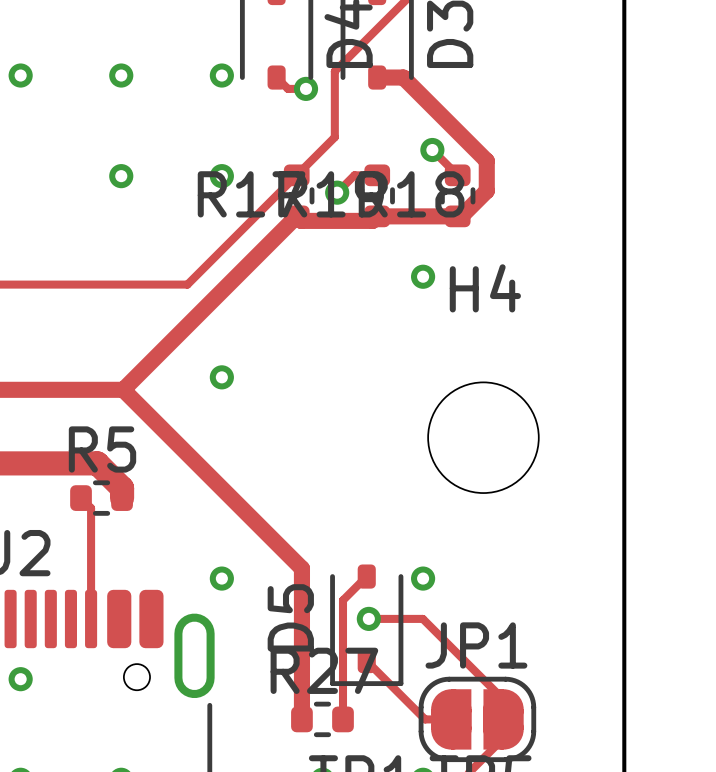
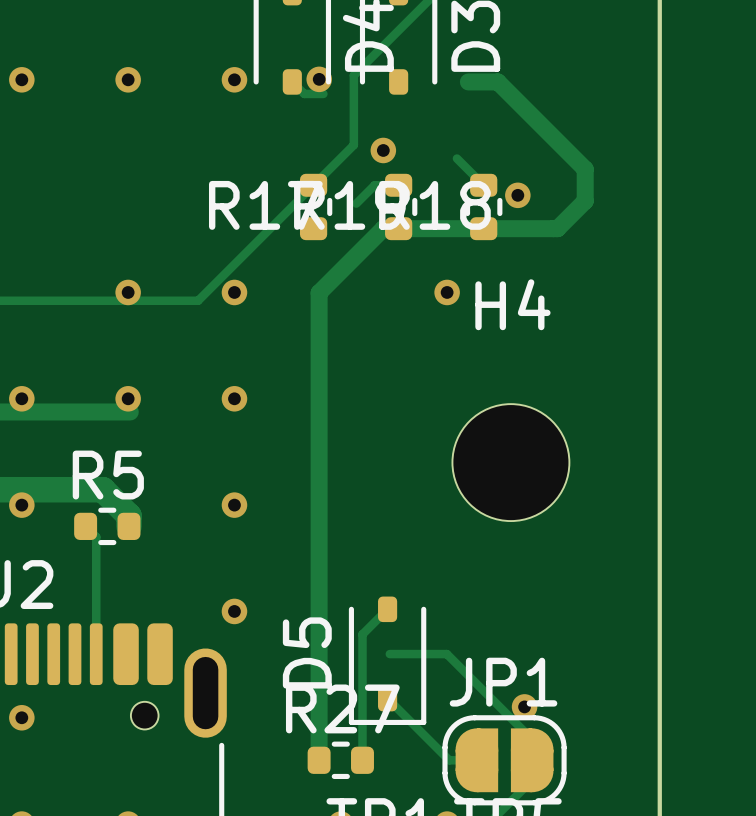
track: (377, 77) (403, 77) (486, 160) (486, 190) (461, 216) -> (468, 81) (497, 81) (585, 169) (585, 201) (557, 228) (487, 228)
via position: (306, 88) -> (319, 79)
via: none -> (383, 150)
via: (432, 150) -> none
via: (121, 176) -> none
via: (221, 176) -> none
via: none -> (517, 195)
via: (337, 192) -> none
track: (377, 216) (372, 220) (301, 220) (296, 216) (123, 389) (301, 568) -> (398, 228) (383, 228) (319, 292) (319, 600)
via: none -> (128, 292)
via: none -> (234, 292)
via: none -> (21, 398)
via: none -> (128, 398)
via: none -> (21, 505)
via: none -> (234, 505)
via: (423, 578) -> none
via: (368, 618) -> none
via: none -> (524, 706)

